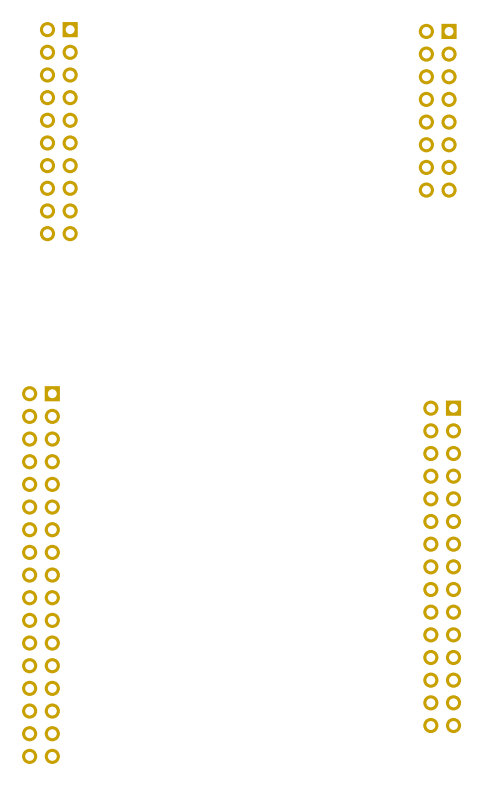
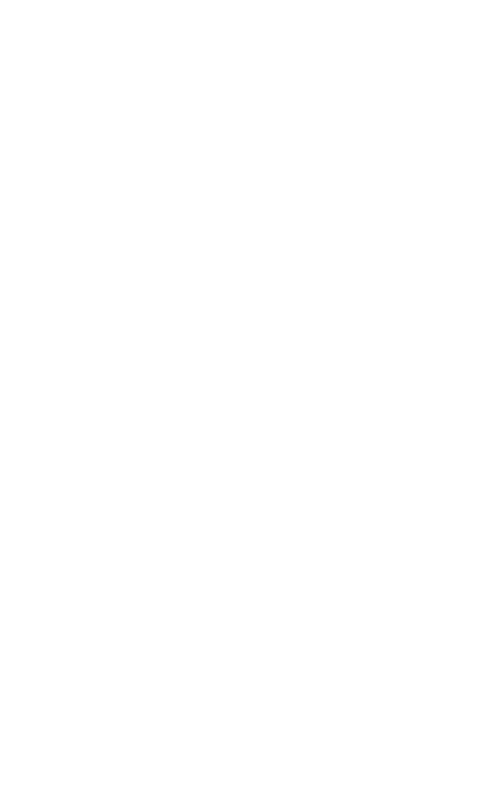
part: (437, 110) -> none
part: (58, 131) -> none
part: (442, 566) -> none
part: (40, 575) -> none

